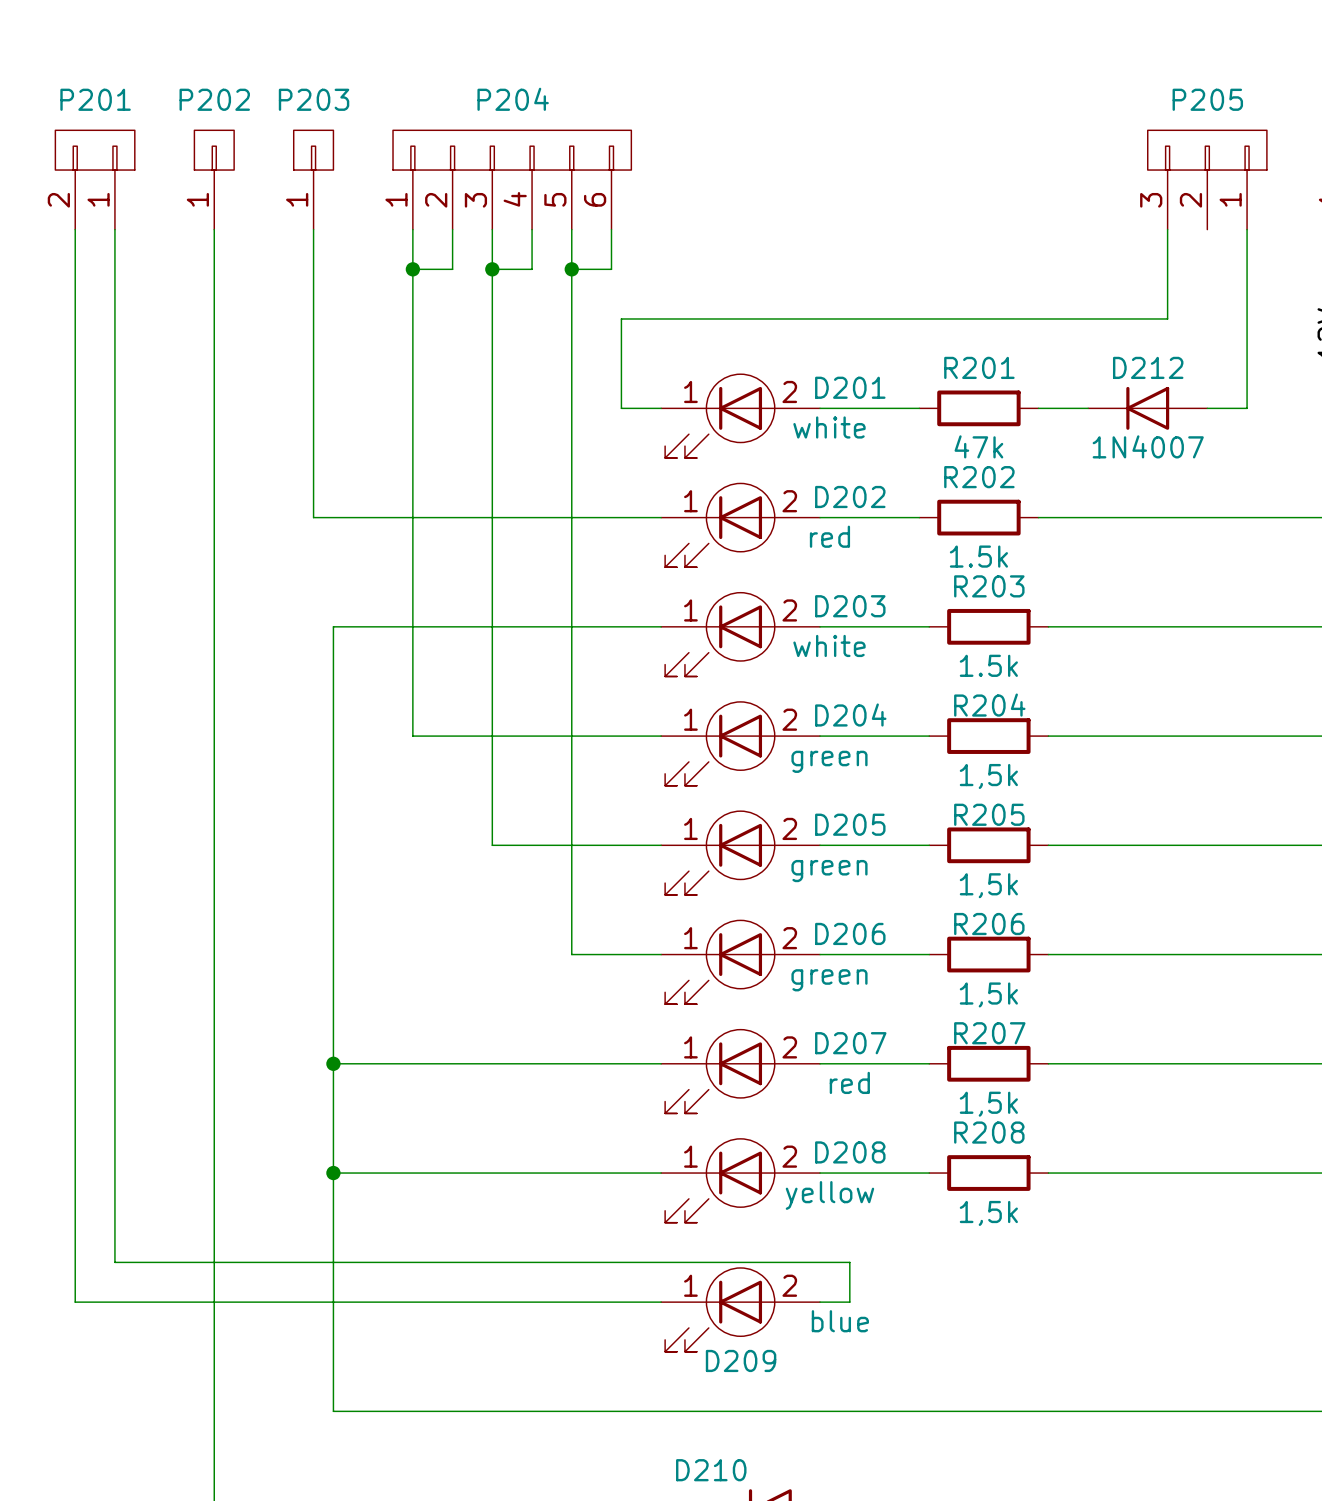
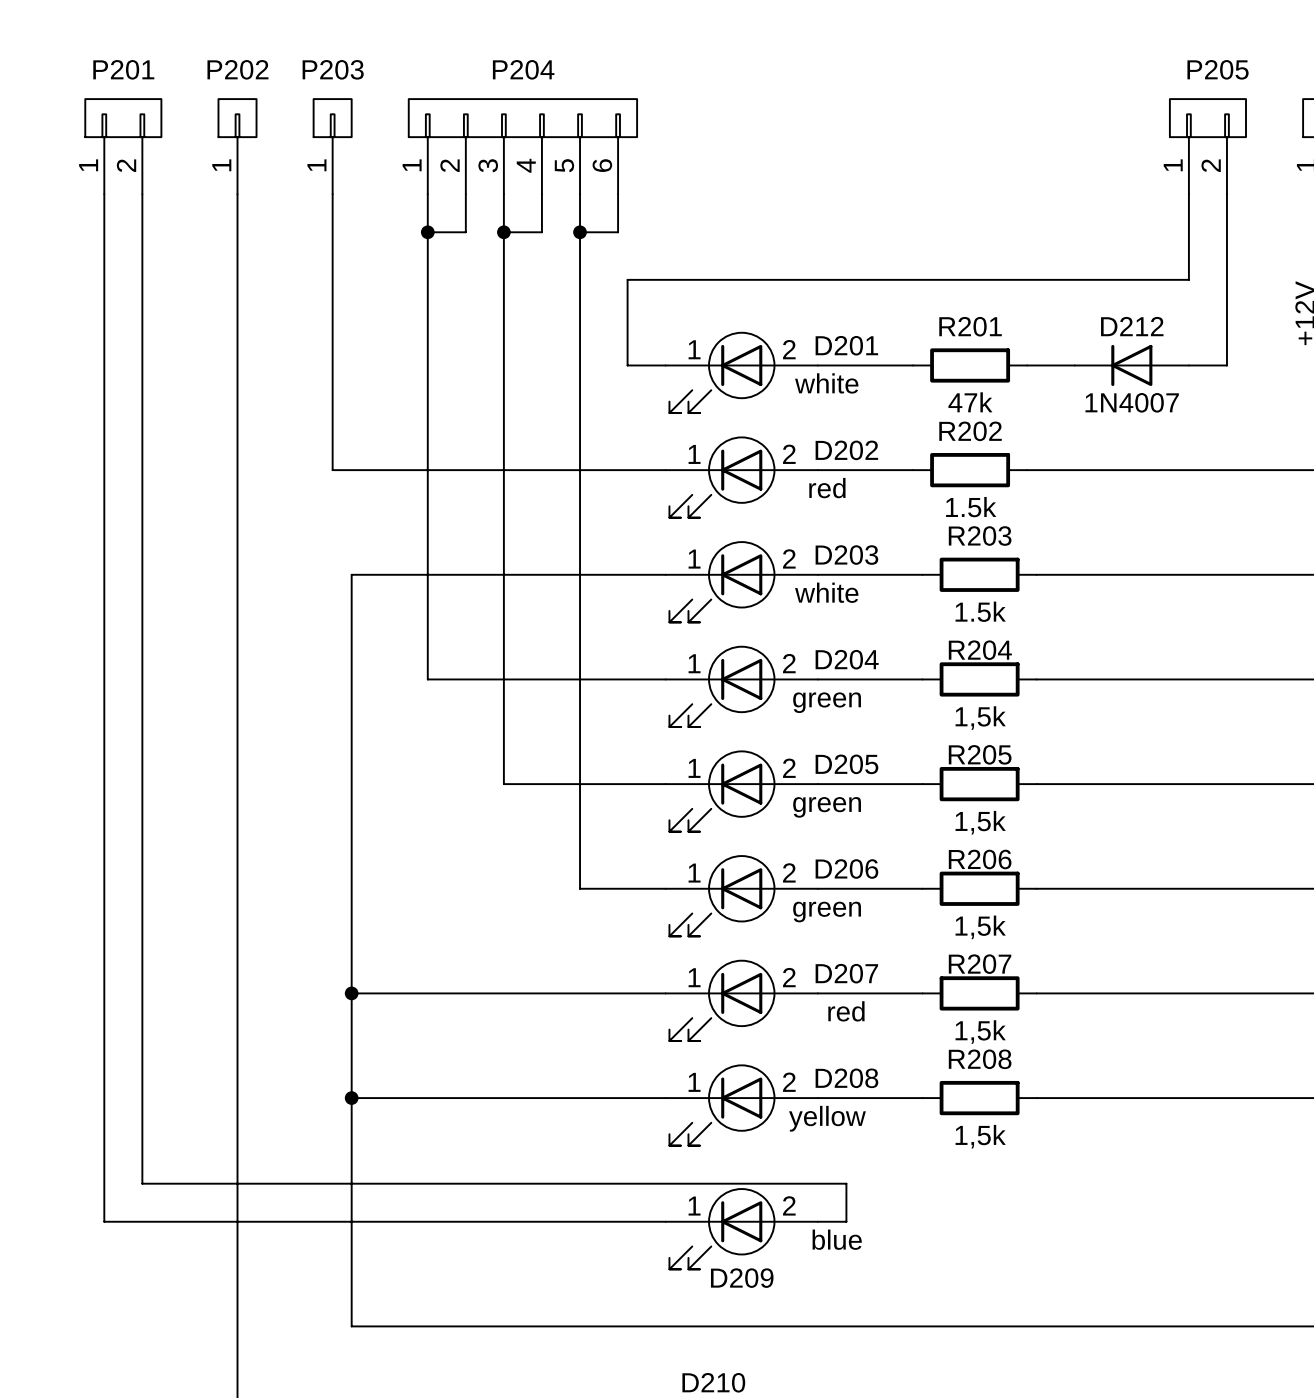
P205 symbol: [1147, 130, 1267, 230] -> [1169, 99, 1247, 195]
P201 flip: as is (95, 150) -> left-right (123, 118)
wire: (1167, 229) (1167, 318) -> (1188, 194) (1188, 279) (1150, 279)

